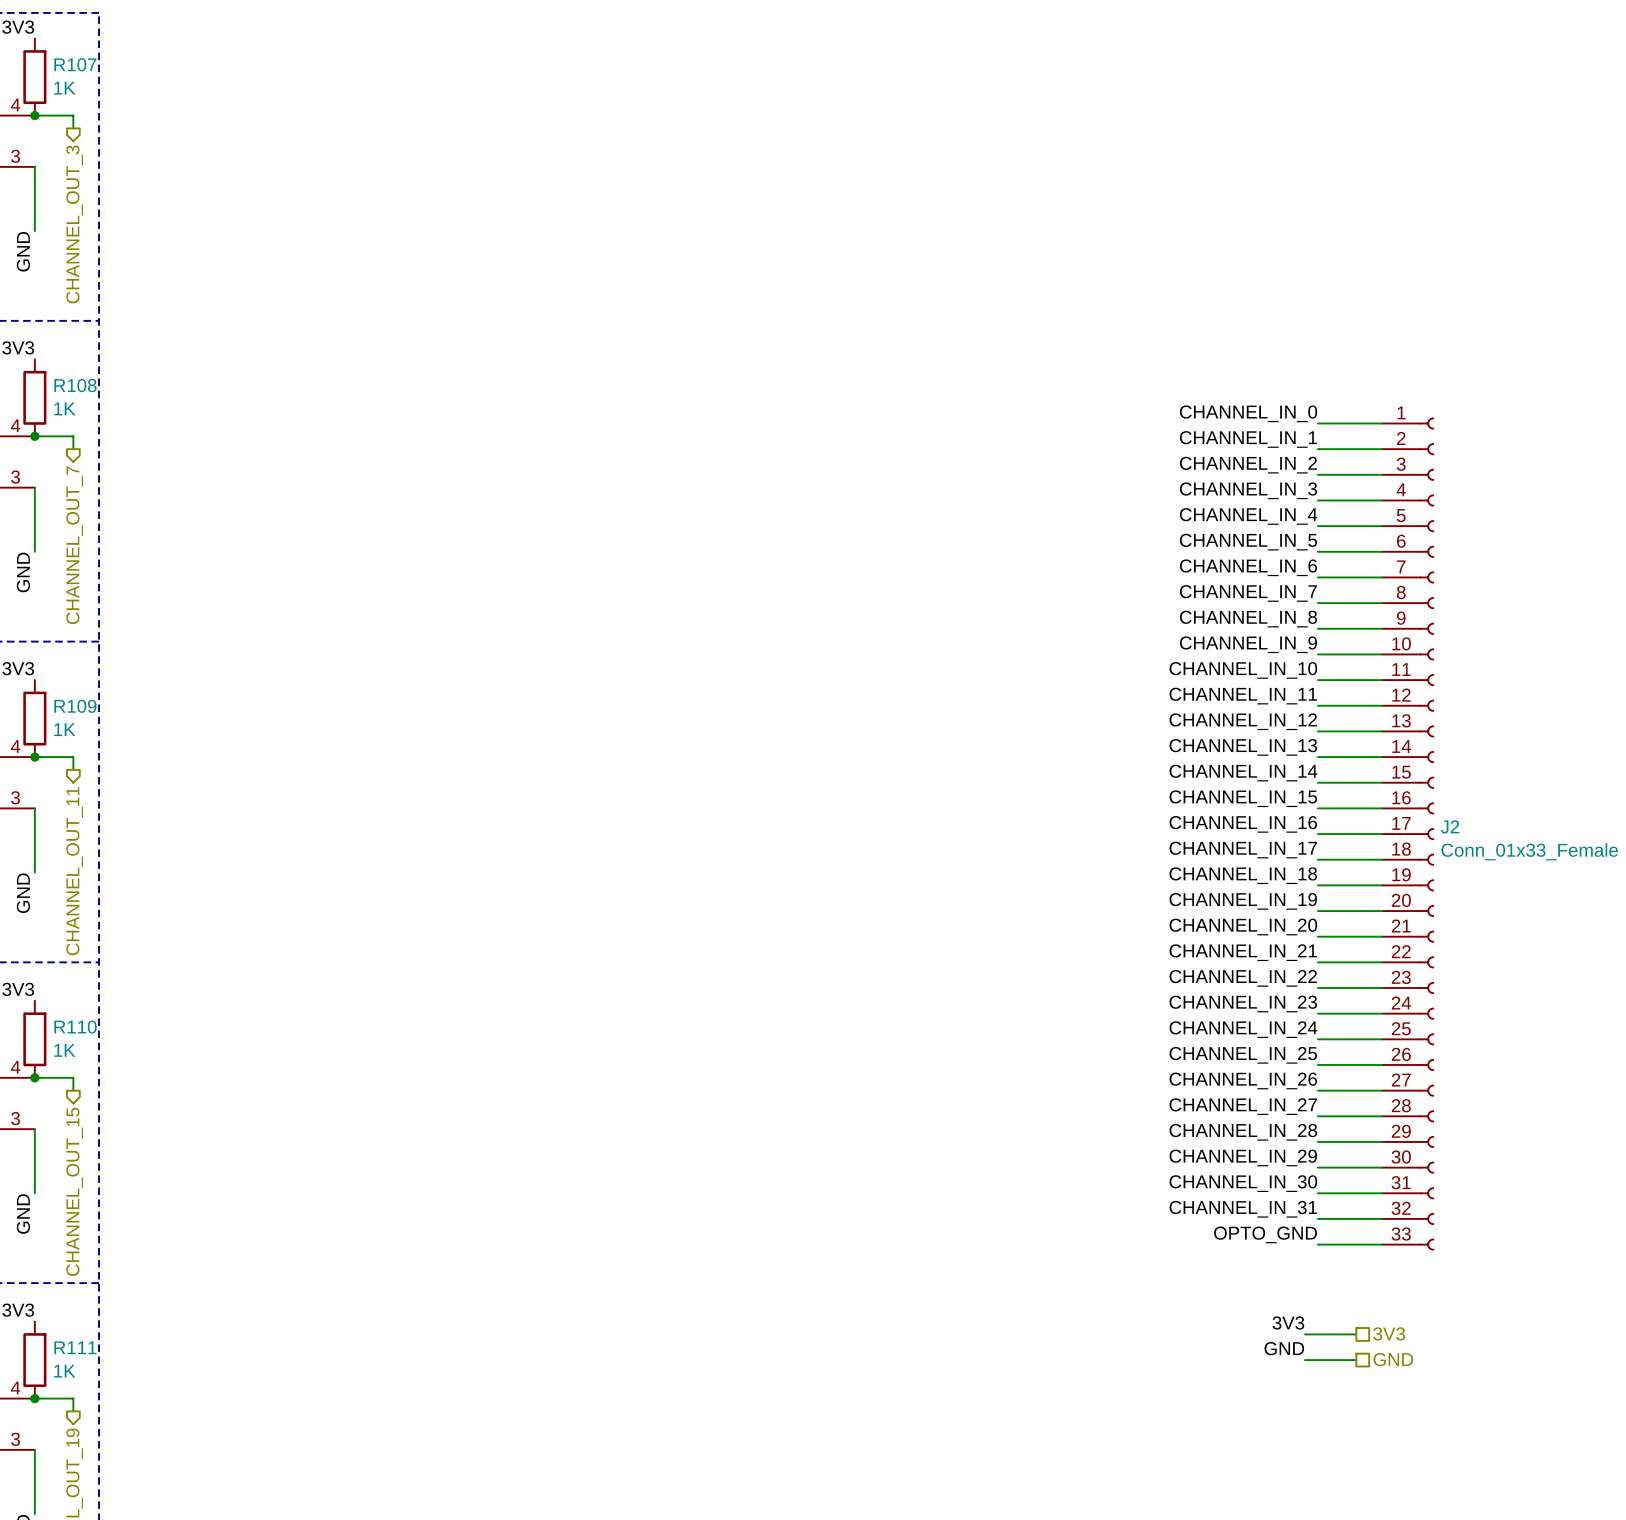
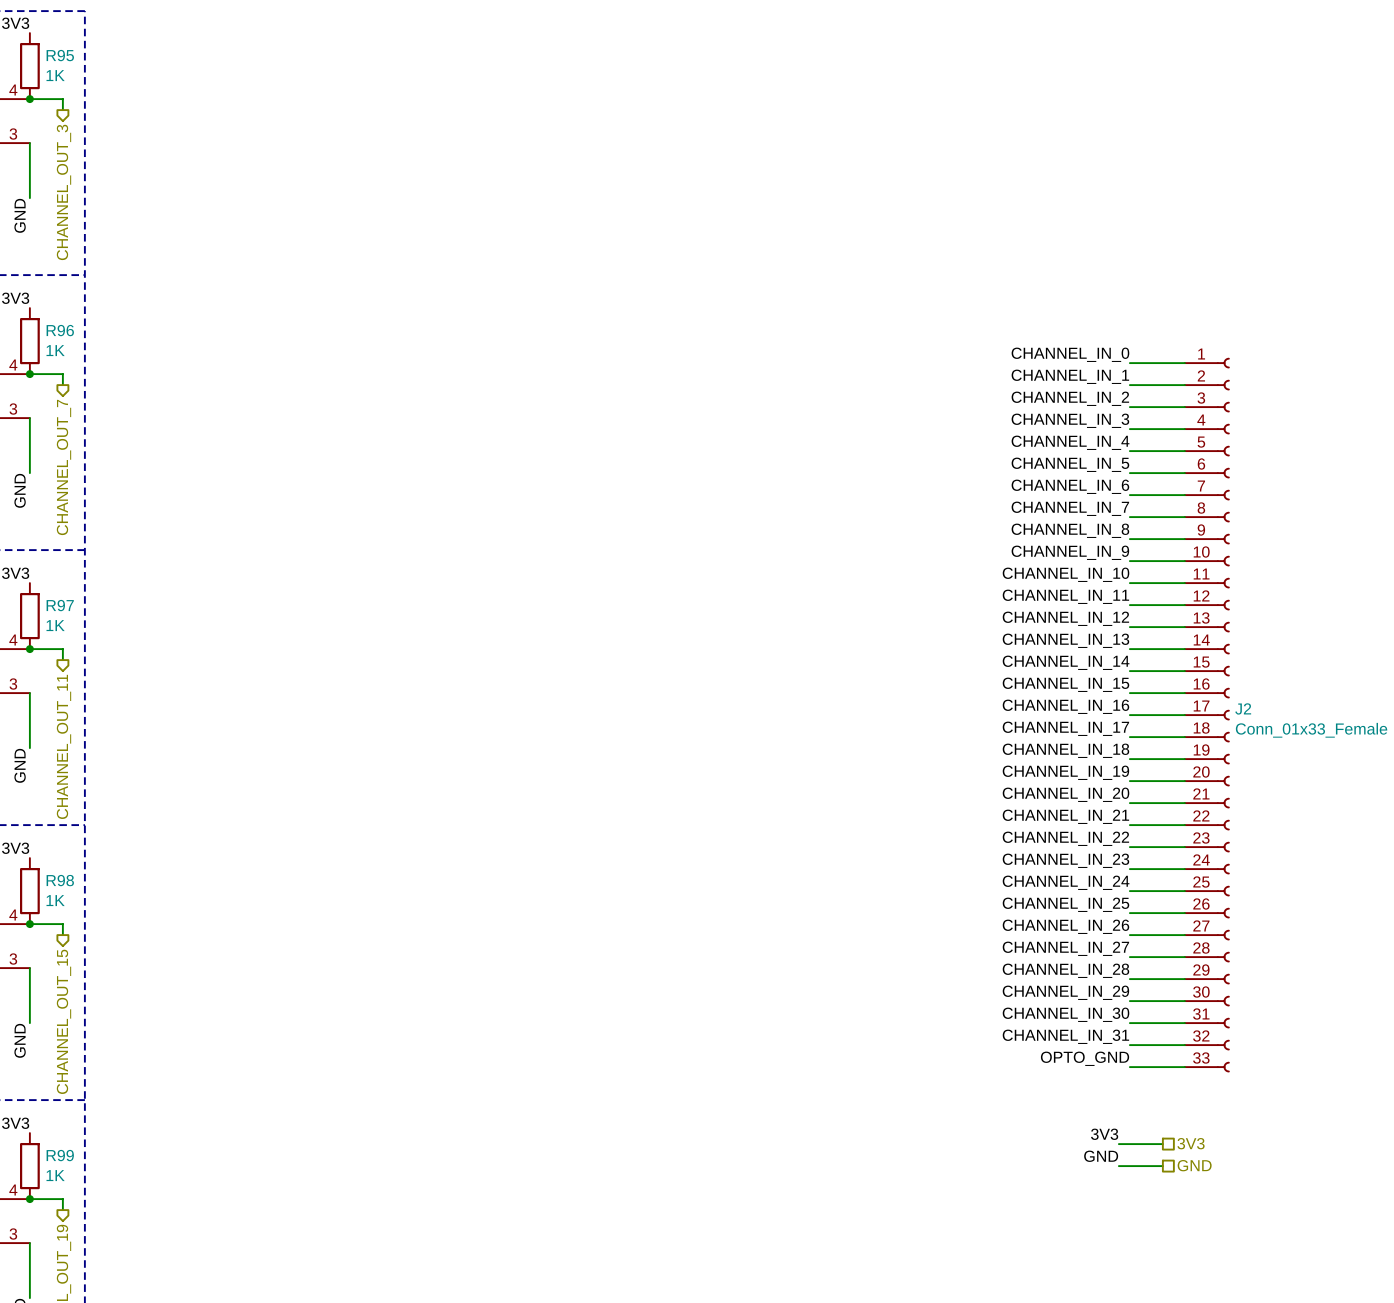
R107 name: R107 (75, 64) -> R95 (60, 55)
R108 name: R108 (75, 385) -> R96 (60, 330)
R109 name: R109 (75, 706) -> R97 (60, 605)
R110 name: R110 (75, 1027) -> R98 (60, 880)
R111 name: R111 (75, 1347) -> R99 (60, 1155)

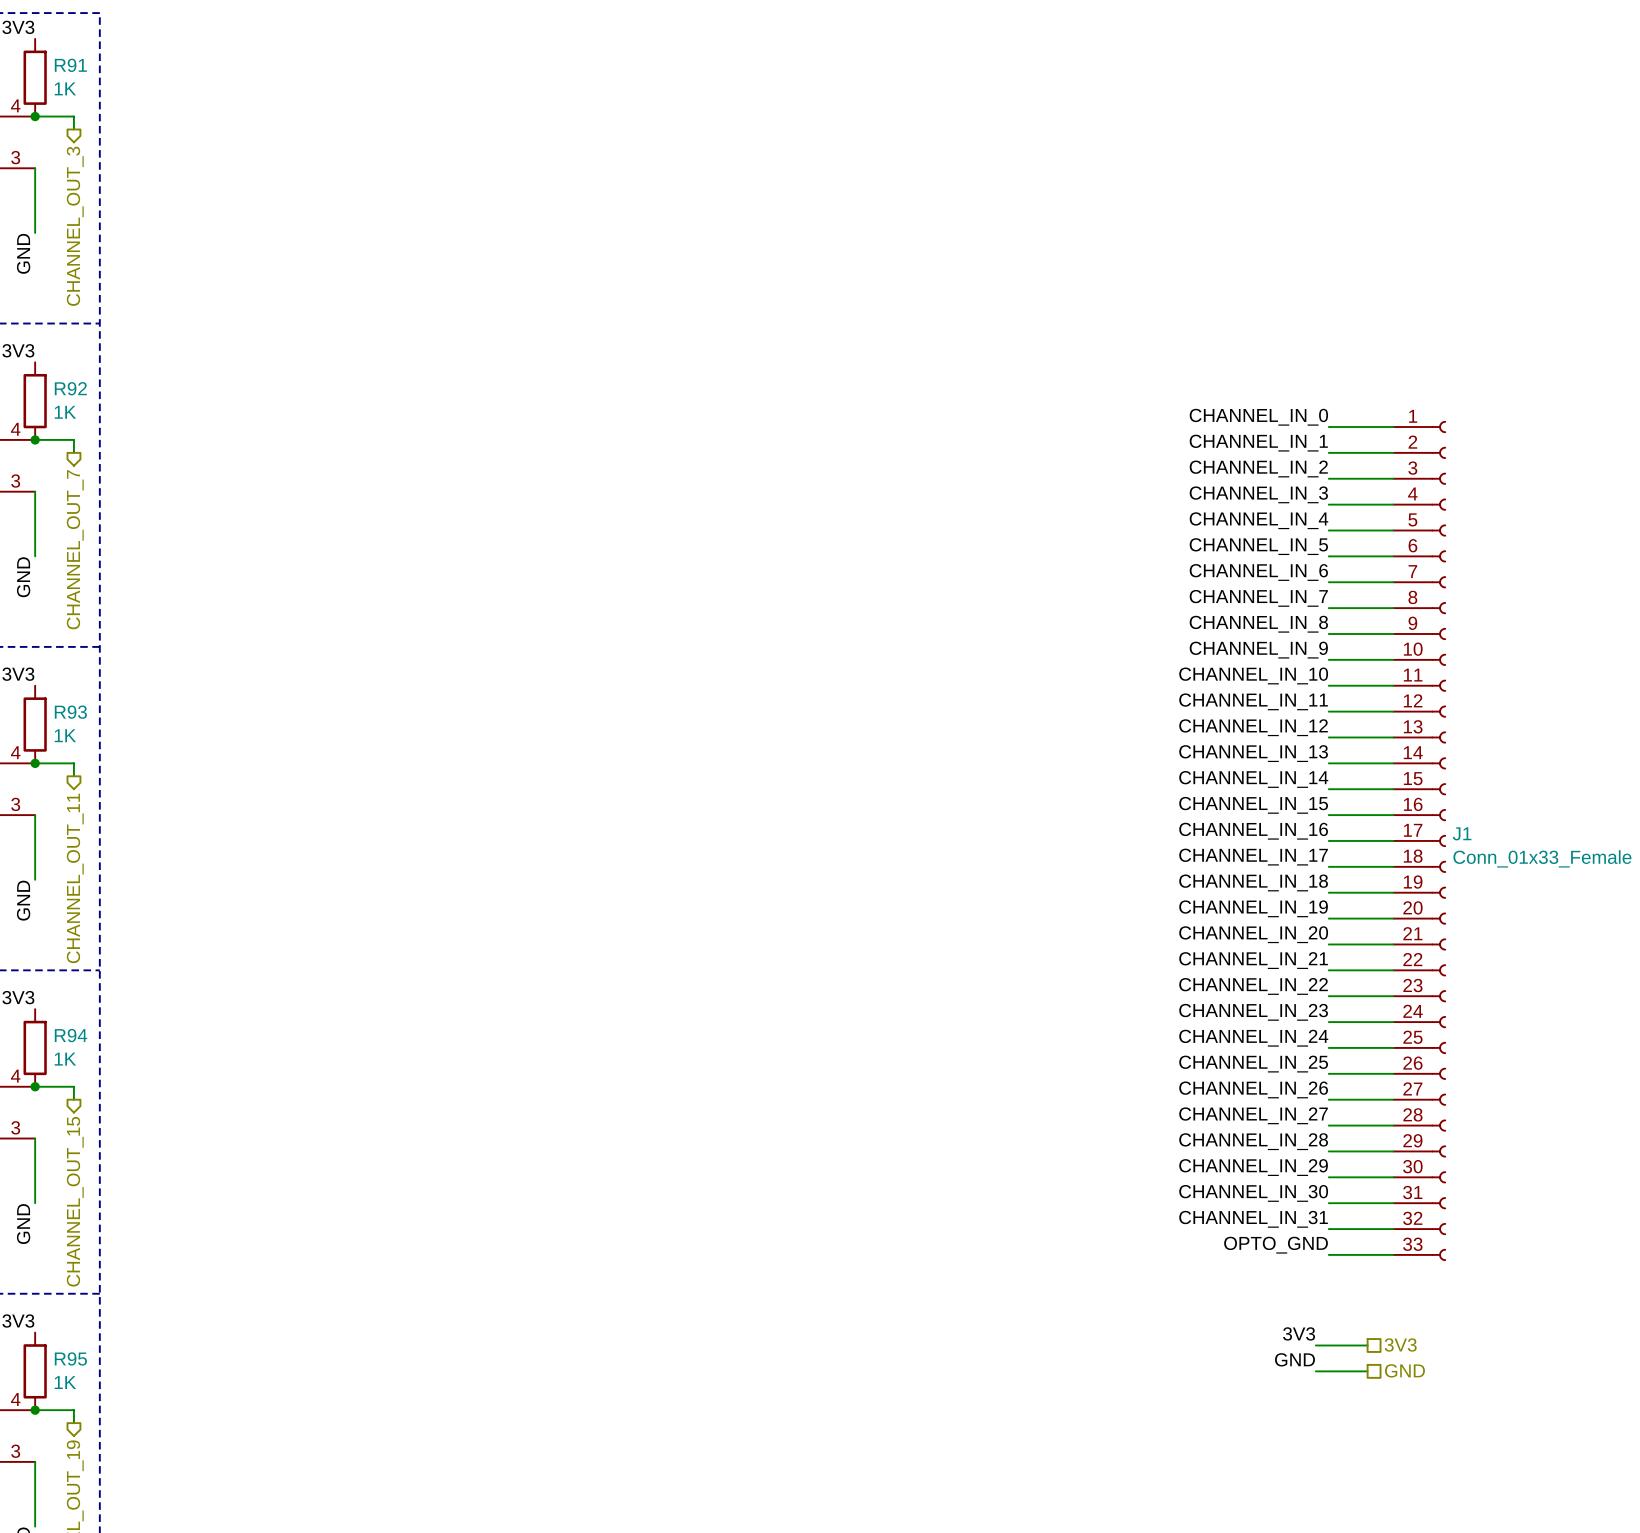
R95 name: R95 (60, 55) -> R91 (70, 65)
R96 name: R96 (60, 330) -> R92 (70, 388)
R97 name: R97 (60, 605) -> R93 (70, 712)
J2 name: J2 (1243, 708) -> J1 (1462, 833)
R98 name: R98 (60, 880) -> R94 (71, 1035)
R99 name: R99 (60, 1155) -> R95 (70, 1358)

